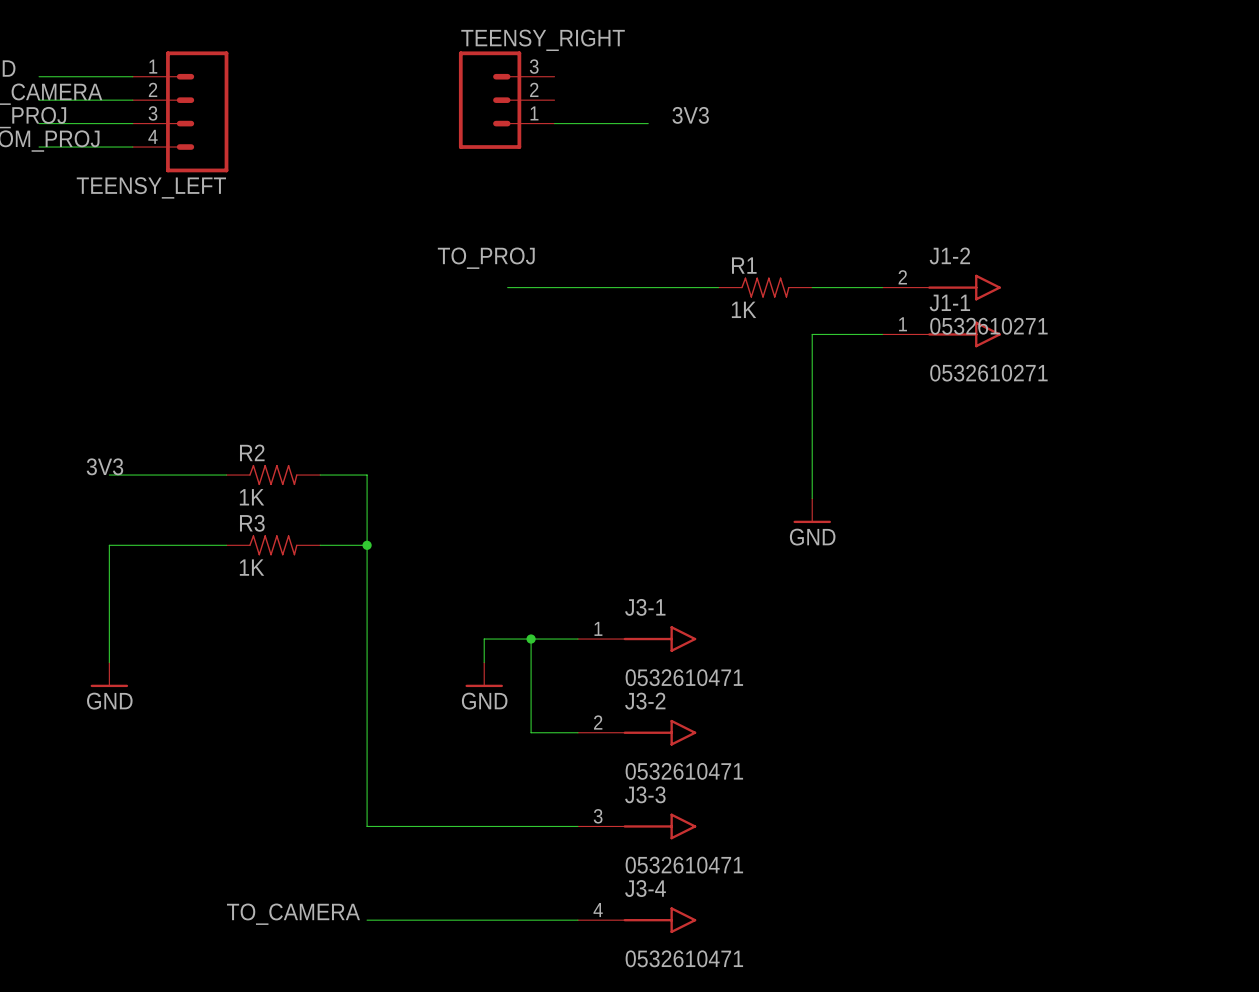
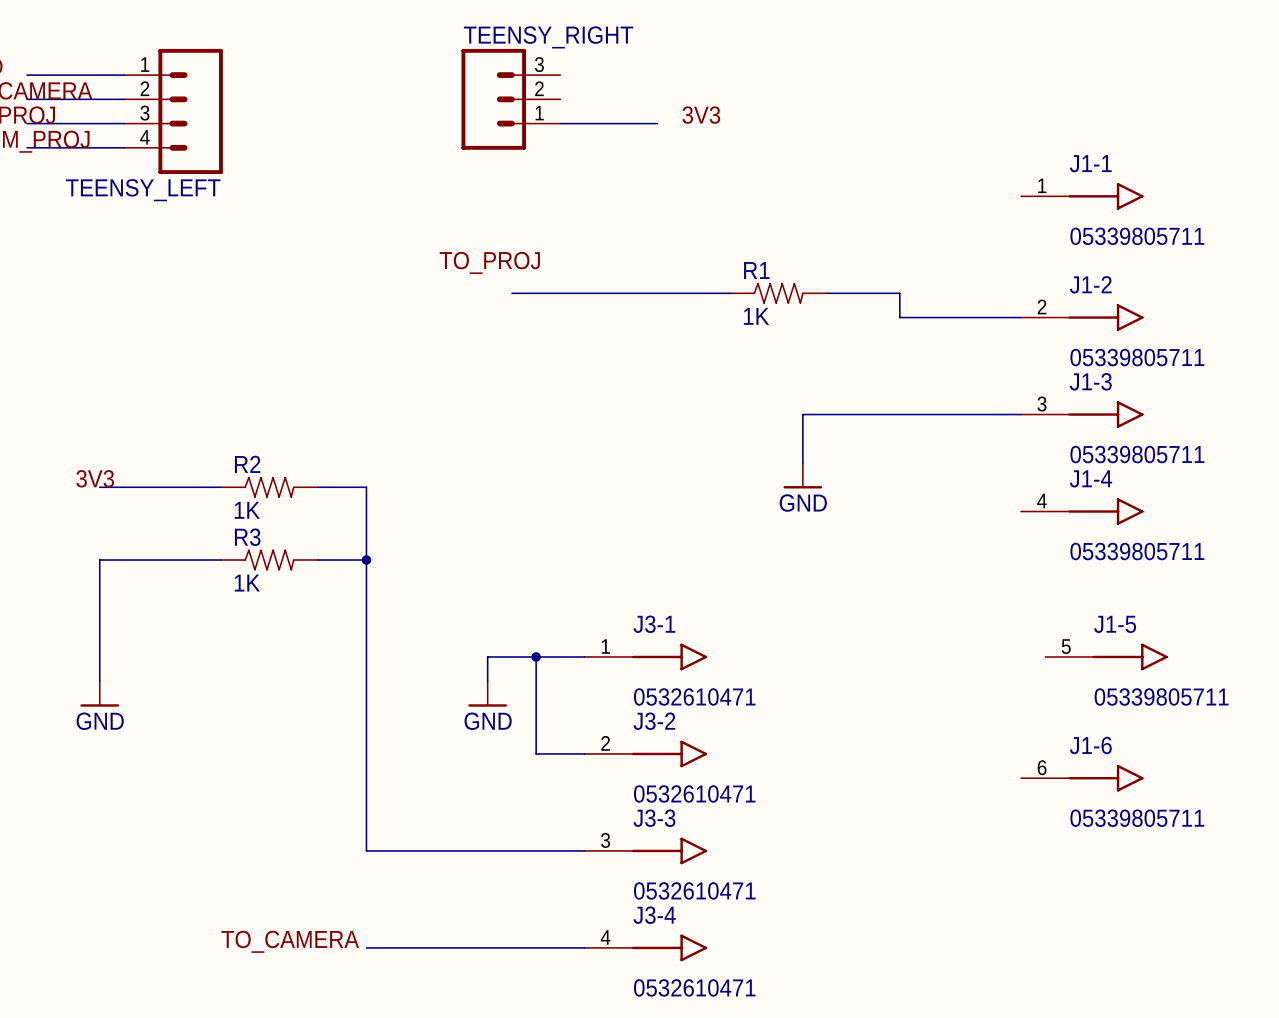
wire: none -> (899, 293) (899, 317) (1021, 317)
J1-2 position: (941, 287) -> (1082, 317)
J1-2 value: 0532610271 (988, 326) -> 05339805711 (1137, 357)
wire: (882, 334) (812, 334) (812, 498) -> none
J1-1 position: (941, 334) -> (1082, 196)
J1-1 value: 0532610271 (988, 373) -> 05339805711 (1137, 236)
wire: none -> (1021, 414) (802, 414) (802, 463)
J1-3: none -> 05339805711 (1082, 414)
J1-4: none -> 05339805711 (1082, 511)
power symbol position: GND (812, 510) -> GND (802, 475)
J1-5: none -> 05339805711 (1106, 656)
J1-6: none -> 05339805711 (1082, 778)

